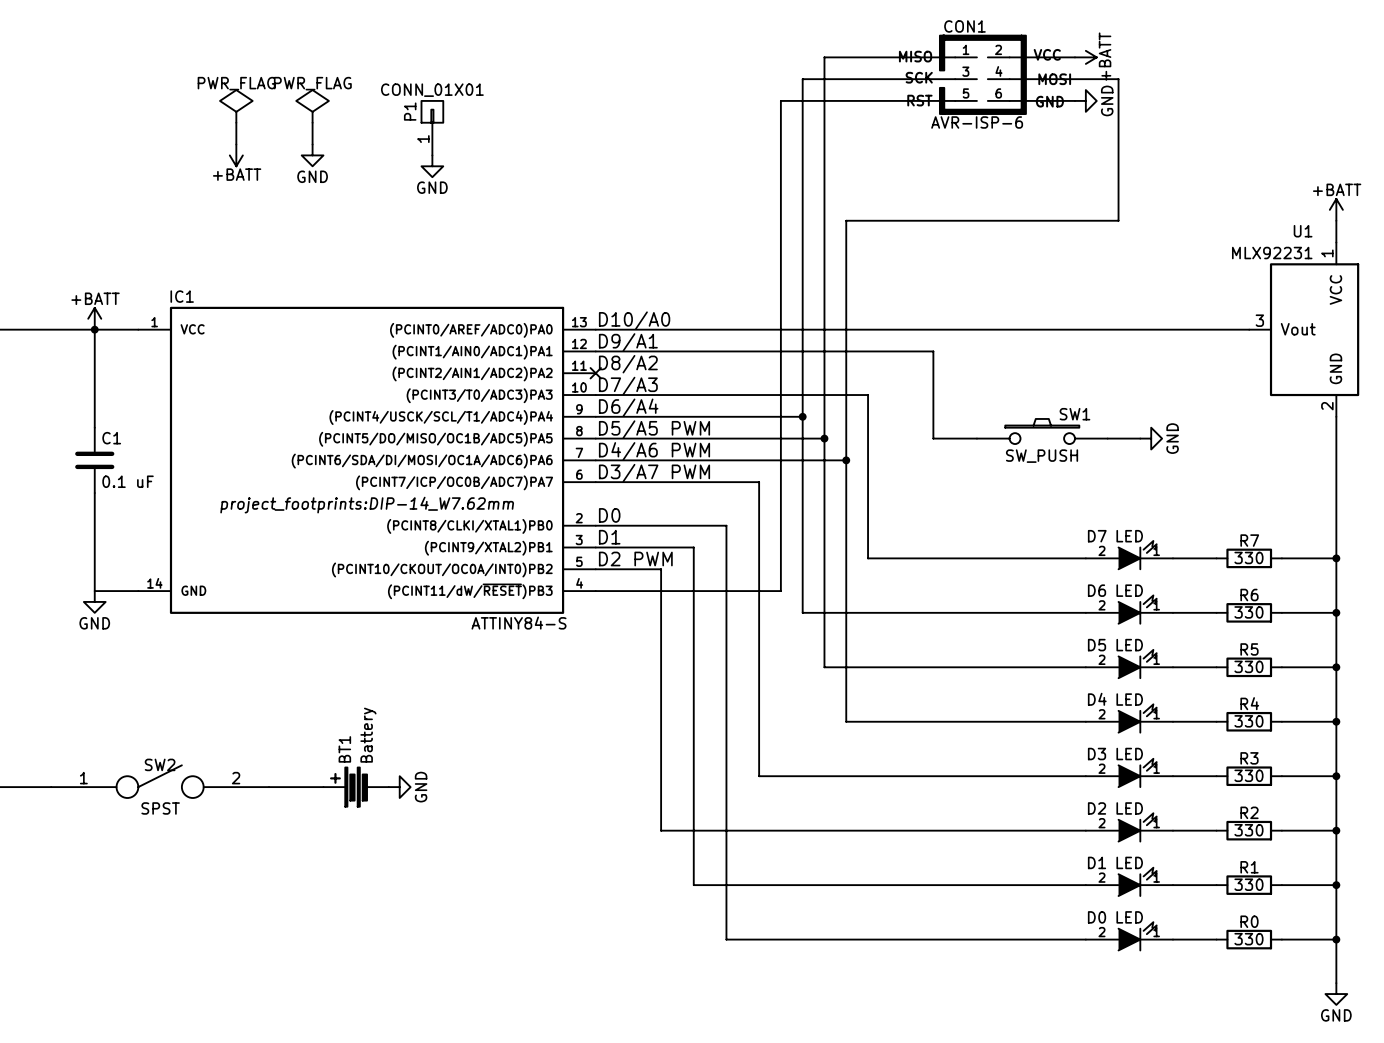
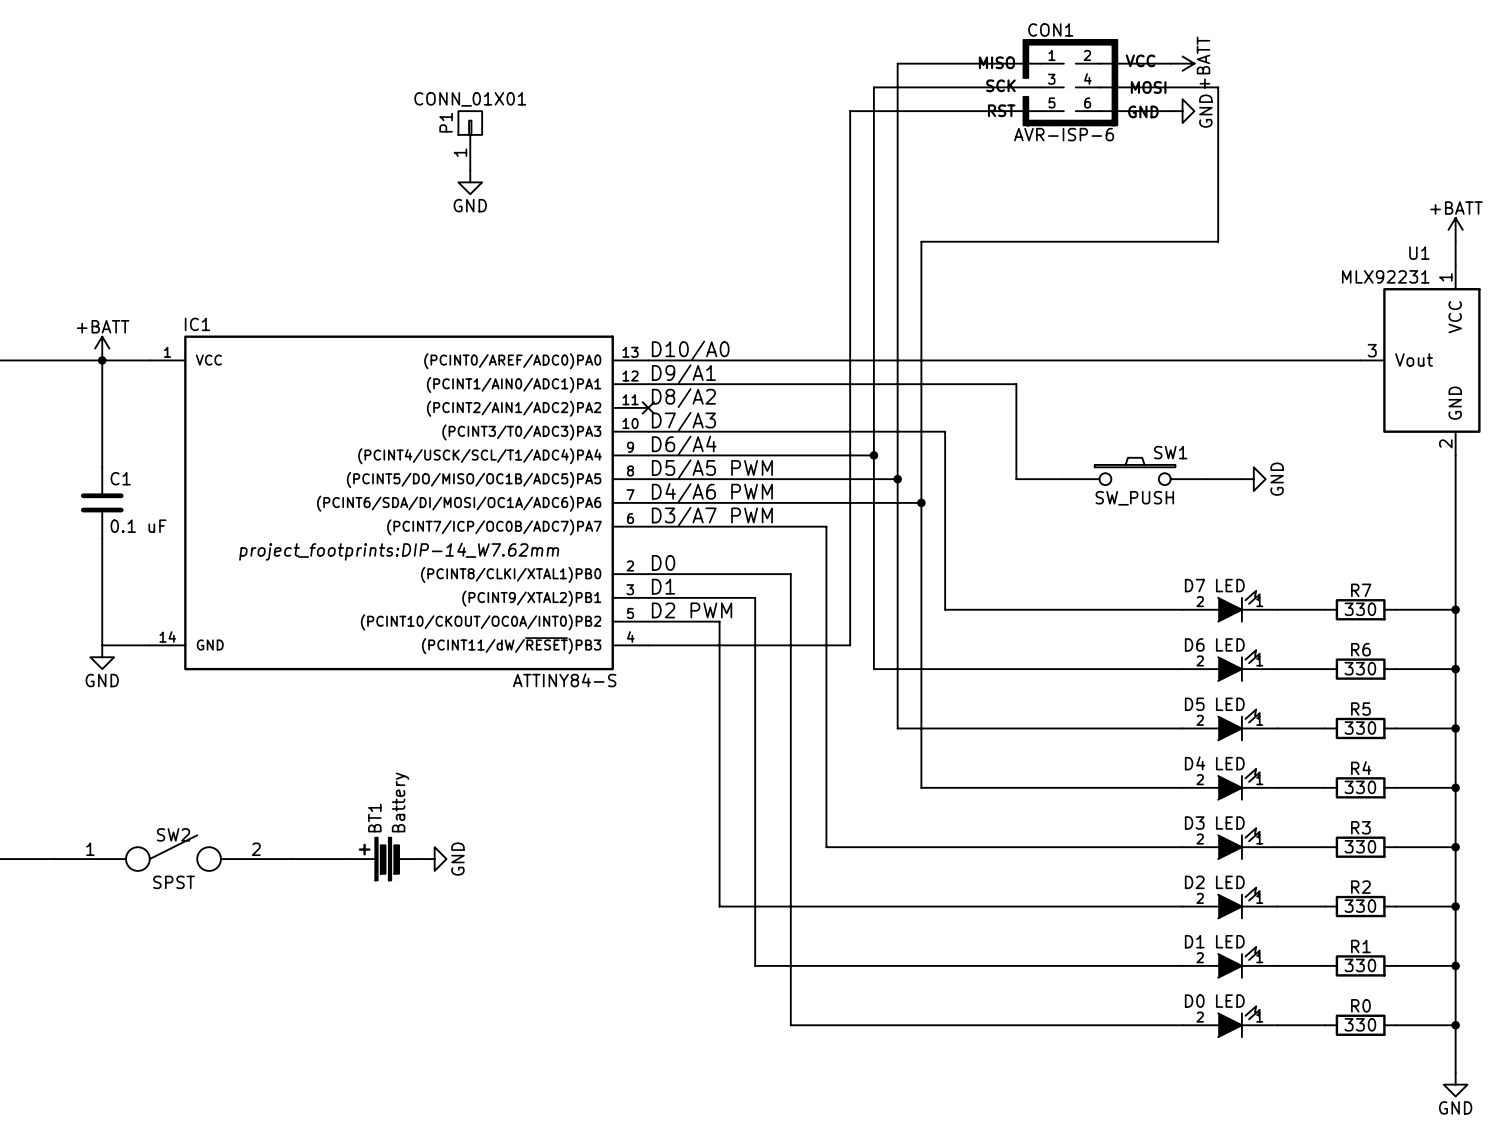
power symbol: PWR_FLAG (236, 106) -> none
power symbol: PWR_FLAG (312, 106) -> none
wire: (236, 122) (236, 144) -> none
wire: (312, 122) (312, 144) -> none
power symbol: +BATT (236, 155) -> none
power symbol: GND (312, 155) -> none

